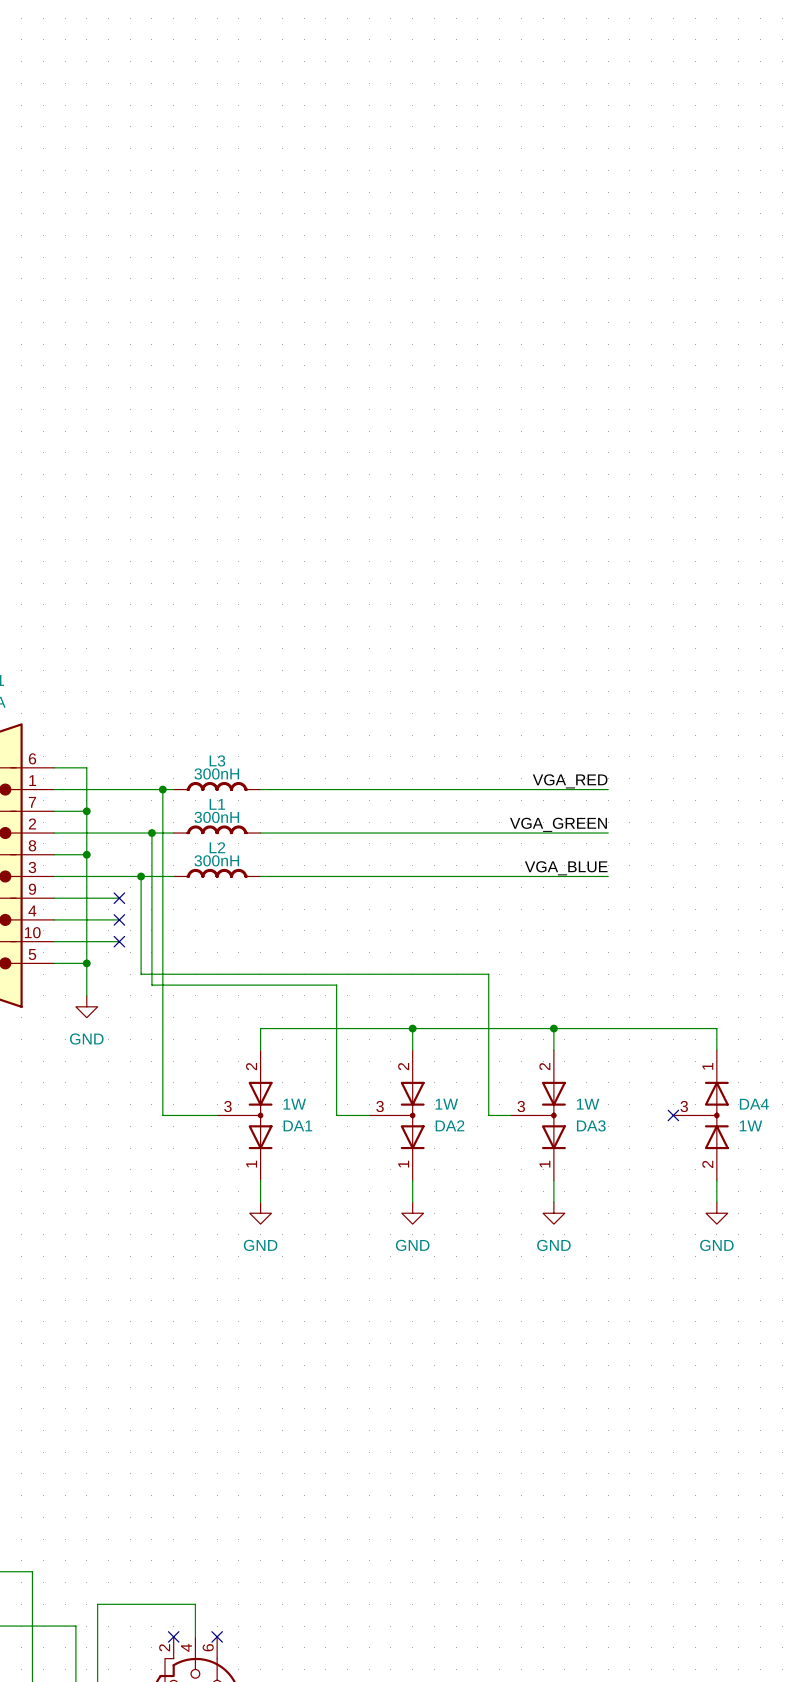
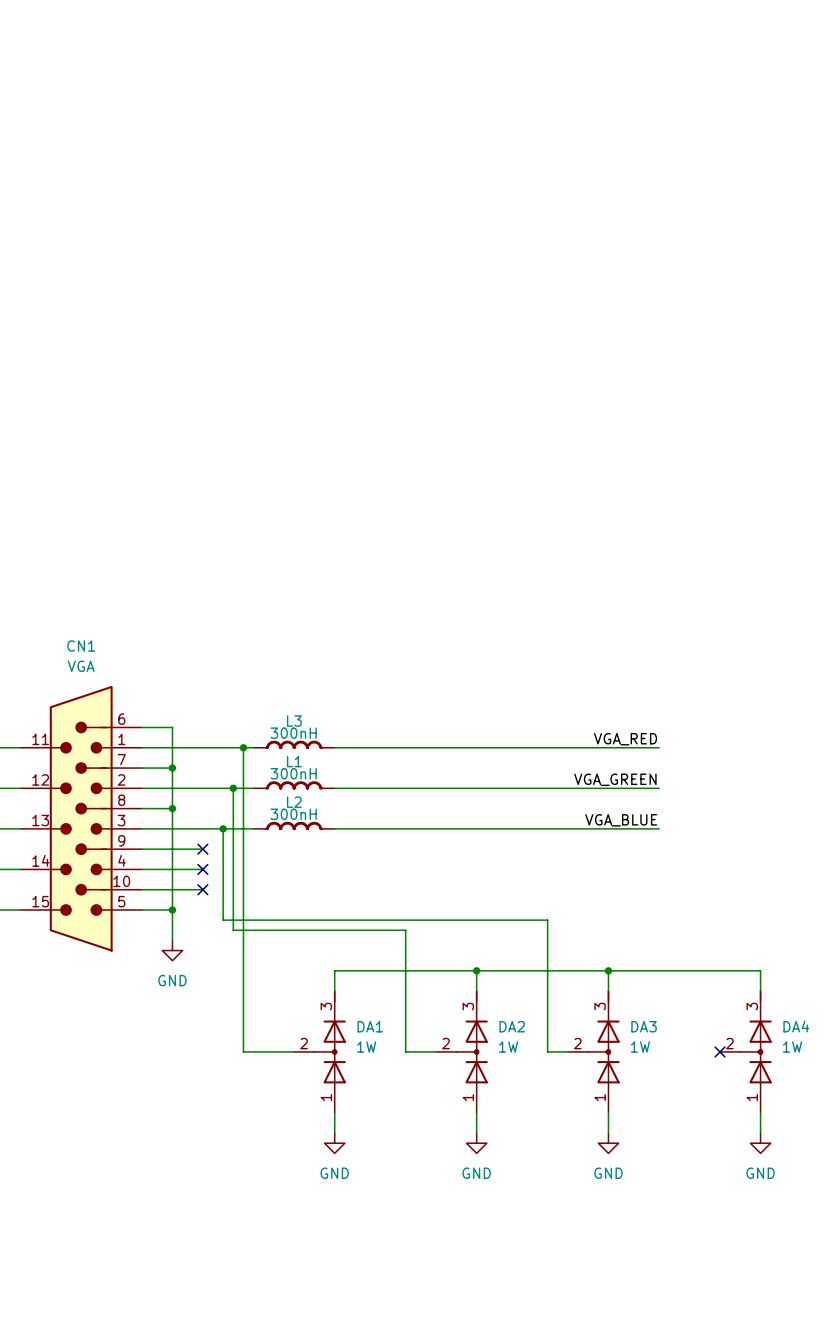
DA1 symbol: [217, 1050, 273, 1181] -> [294, 991, 346, 1113]
DA2 symbol: [369, 1050, 425, 1181] -> [436, 991, 488, 1113]
DA3 symbol: [510, 1050, 566, 1181] -> [567, 991, 620, 1113]
DA4 symbol: [673, 1050, 729, 1181] -> [720, 991, 772, 1113]
DA1 name position: DA1 (297, 1125) -> DA1 (370, 1026)
DA2 name position: DA2 (450, 1125) -> DA2 (512, 1026)
DA3 name position: DA3 (591, 1125) -> DA3 (644, 1026)

